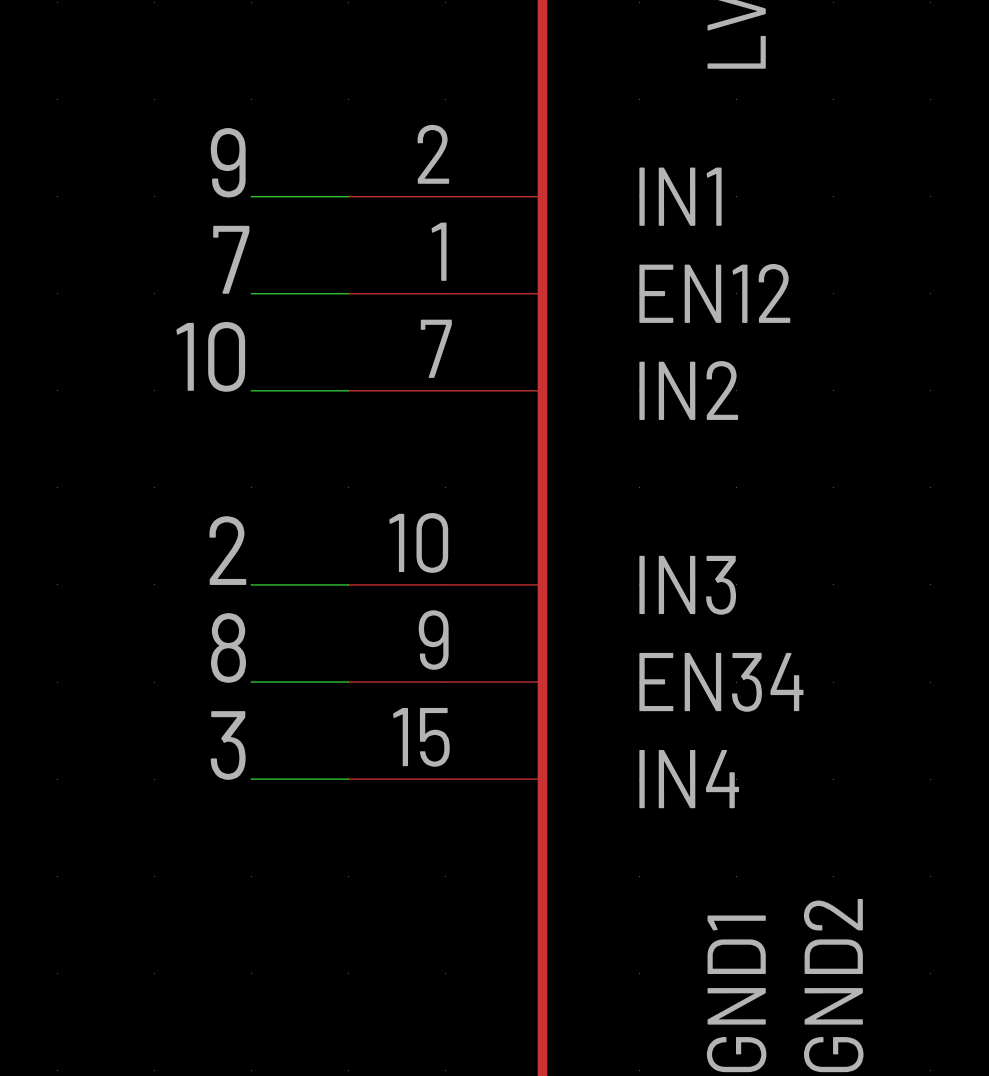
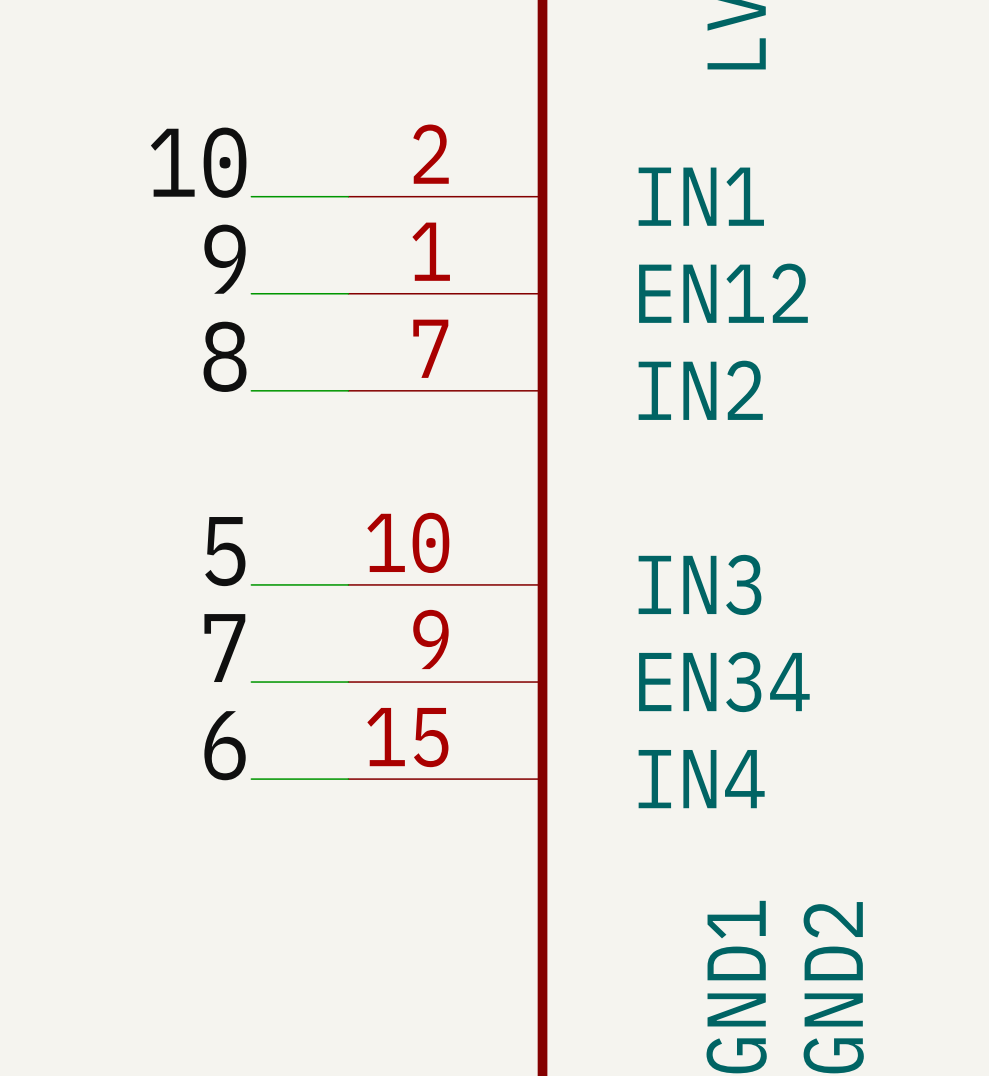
label: 9 (228, 162) -> 10 (198, 162)
label: 7 (231, 259) -> 9 (225, 259)
label: 10 (210, 356) -> 8 (225, 356)
label: 2 (227, 550) -> 5 (225, 551)
label: 8 (228, 647) -> 7 (224, 648)
label: 3 (228, 745) -> 6 (225, 745)

